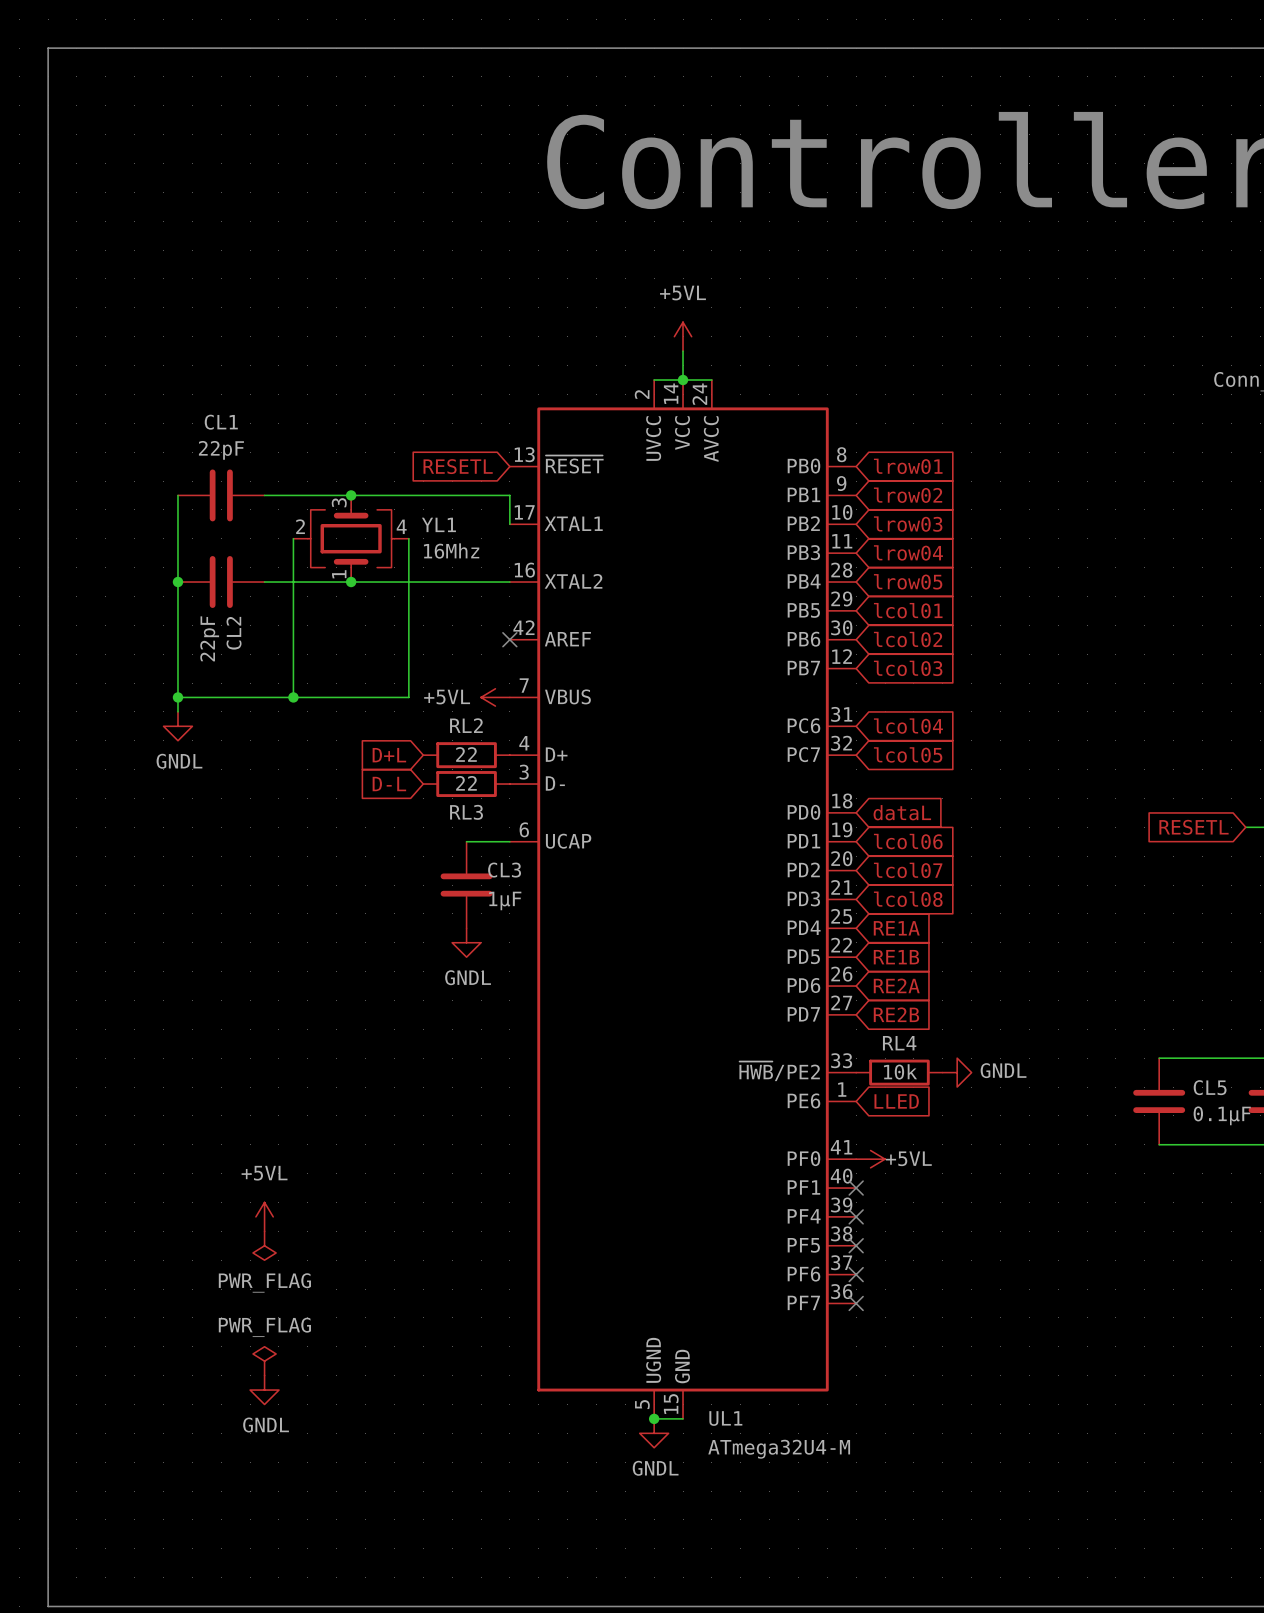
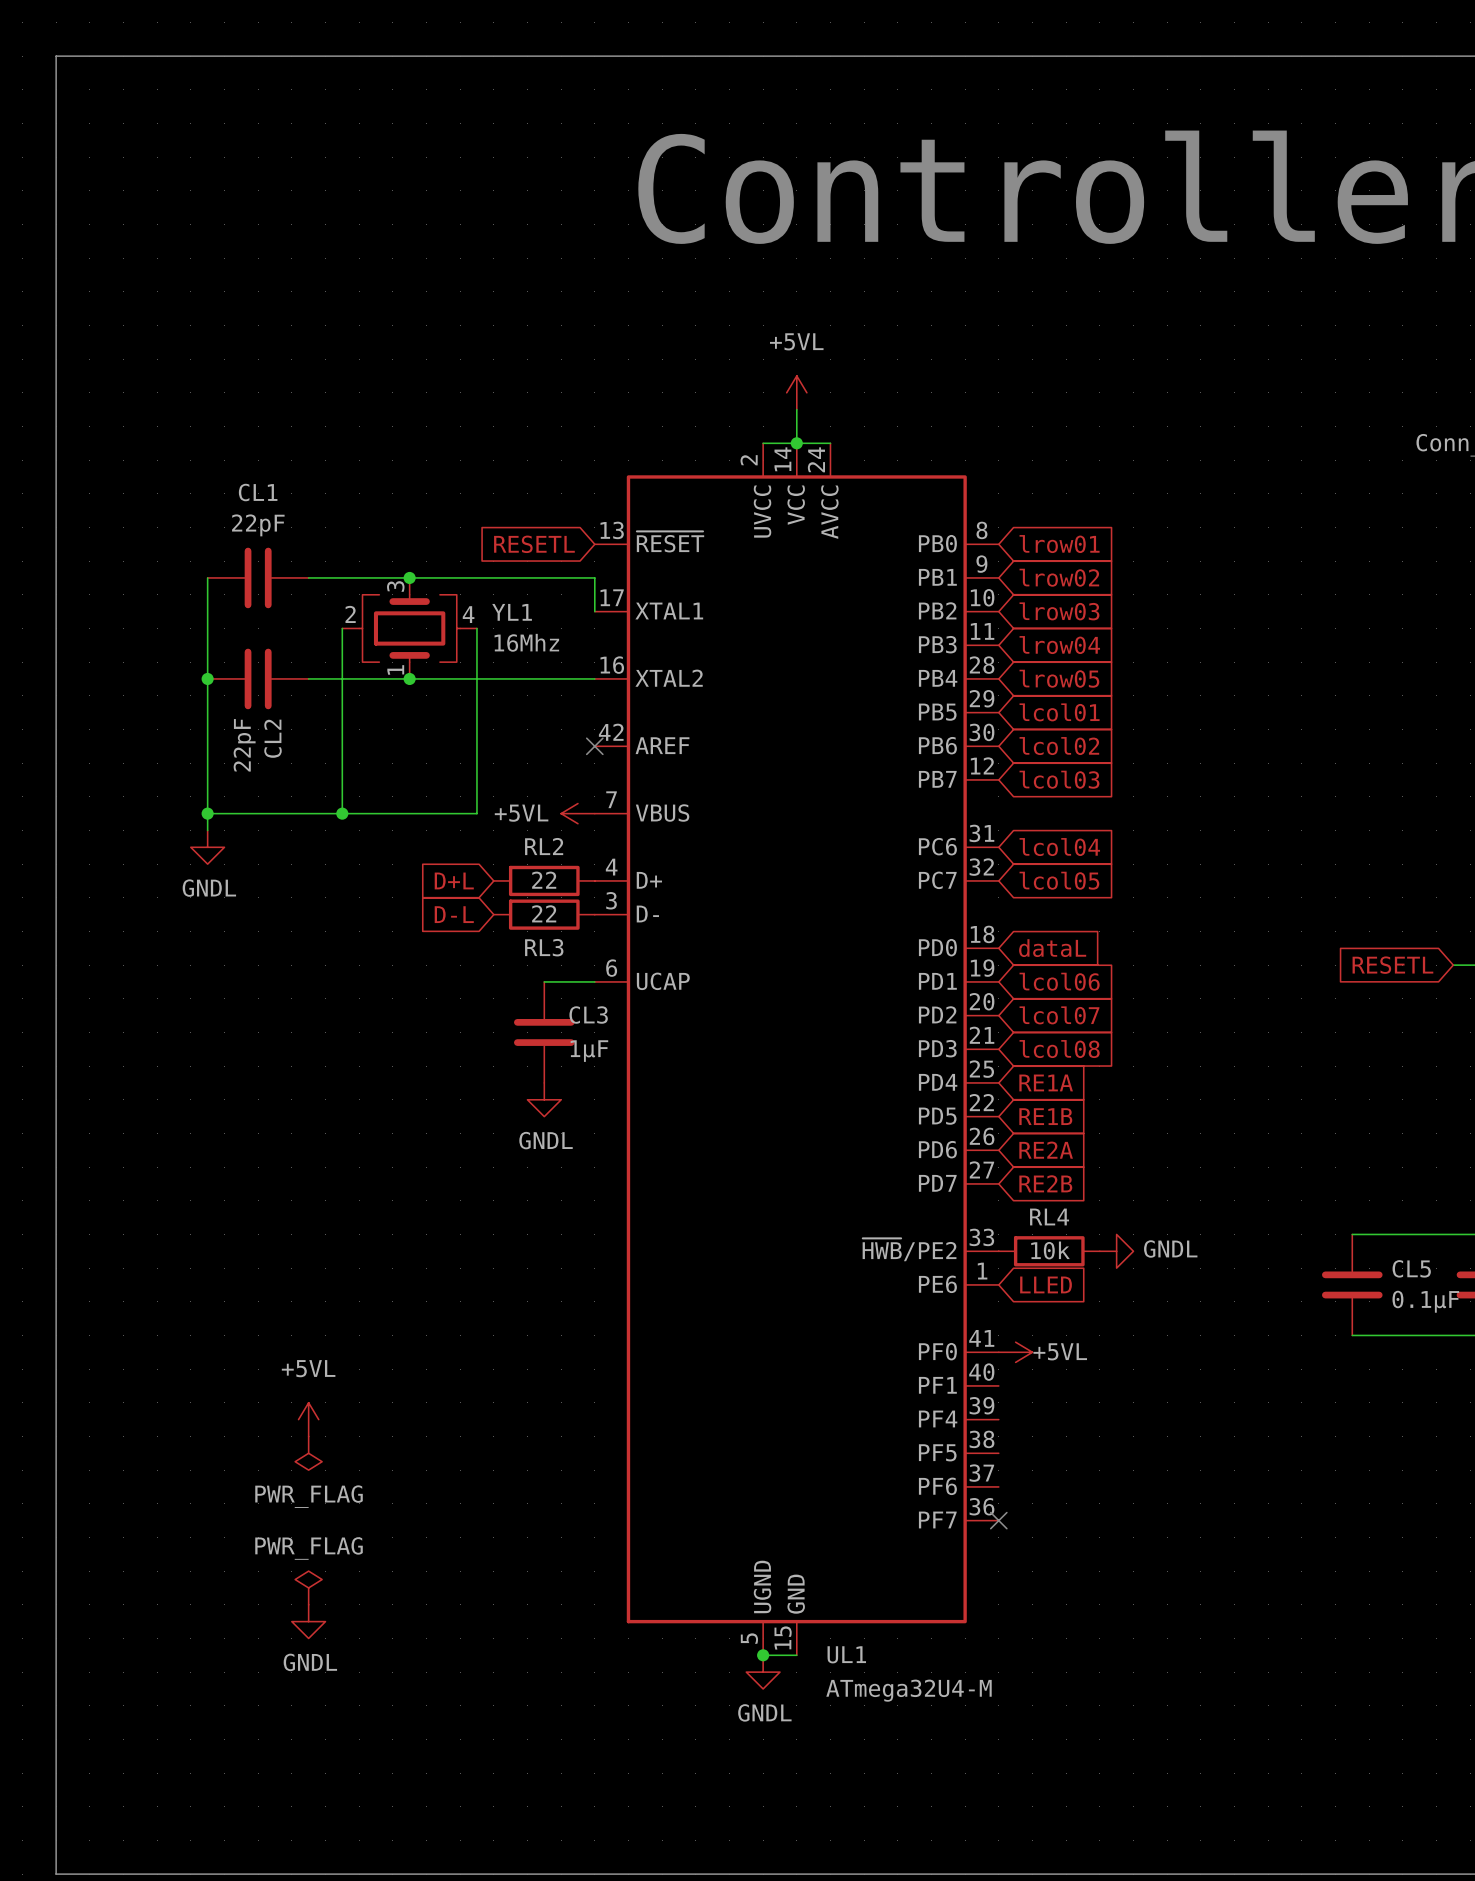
no-connect mark: (856, 1188) -> none
no-connect mark: (856, 1216) -> none
no-connect mark: (856, 1245) -> none
no-connect mark: (856, 1274) -> none

